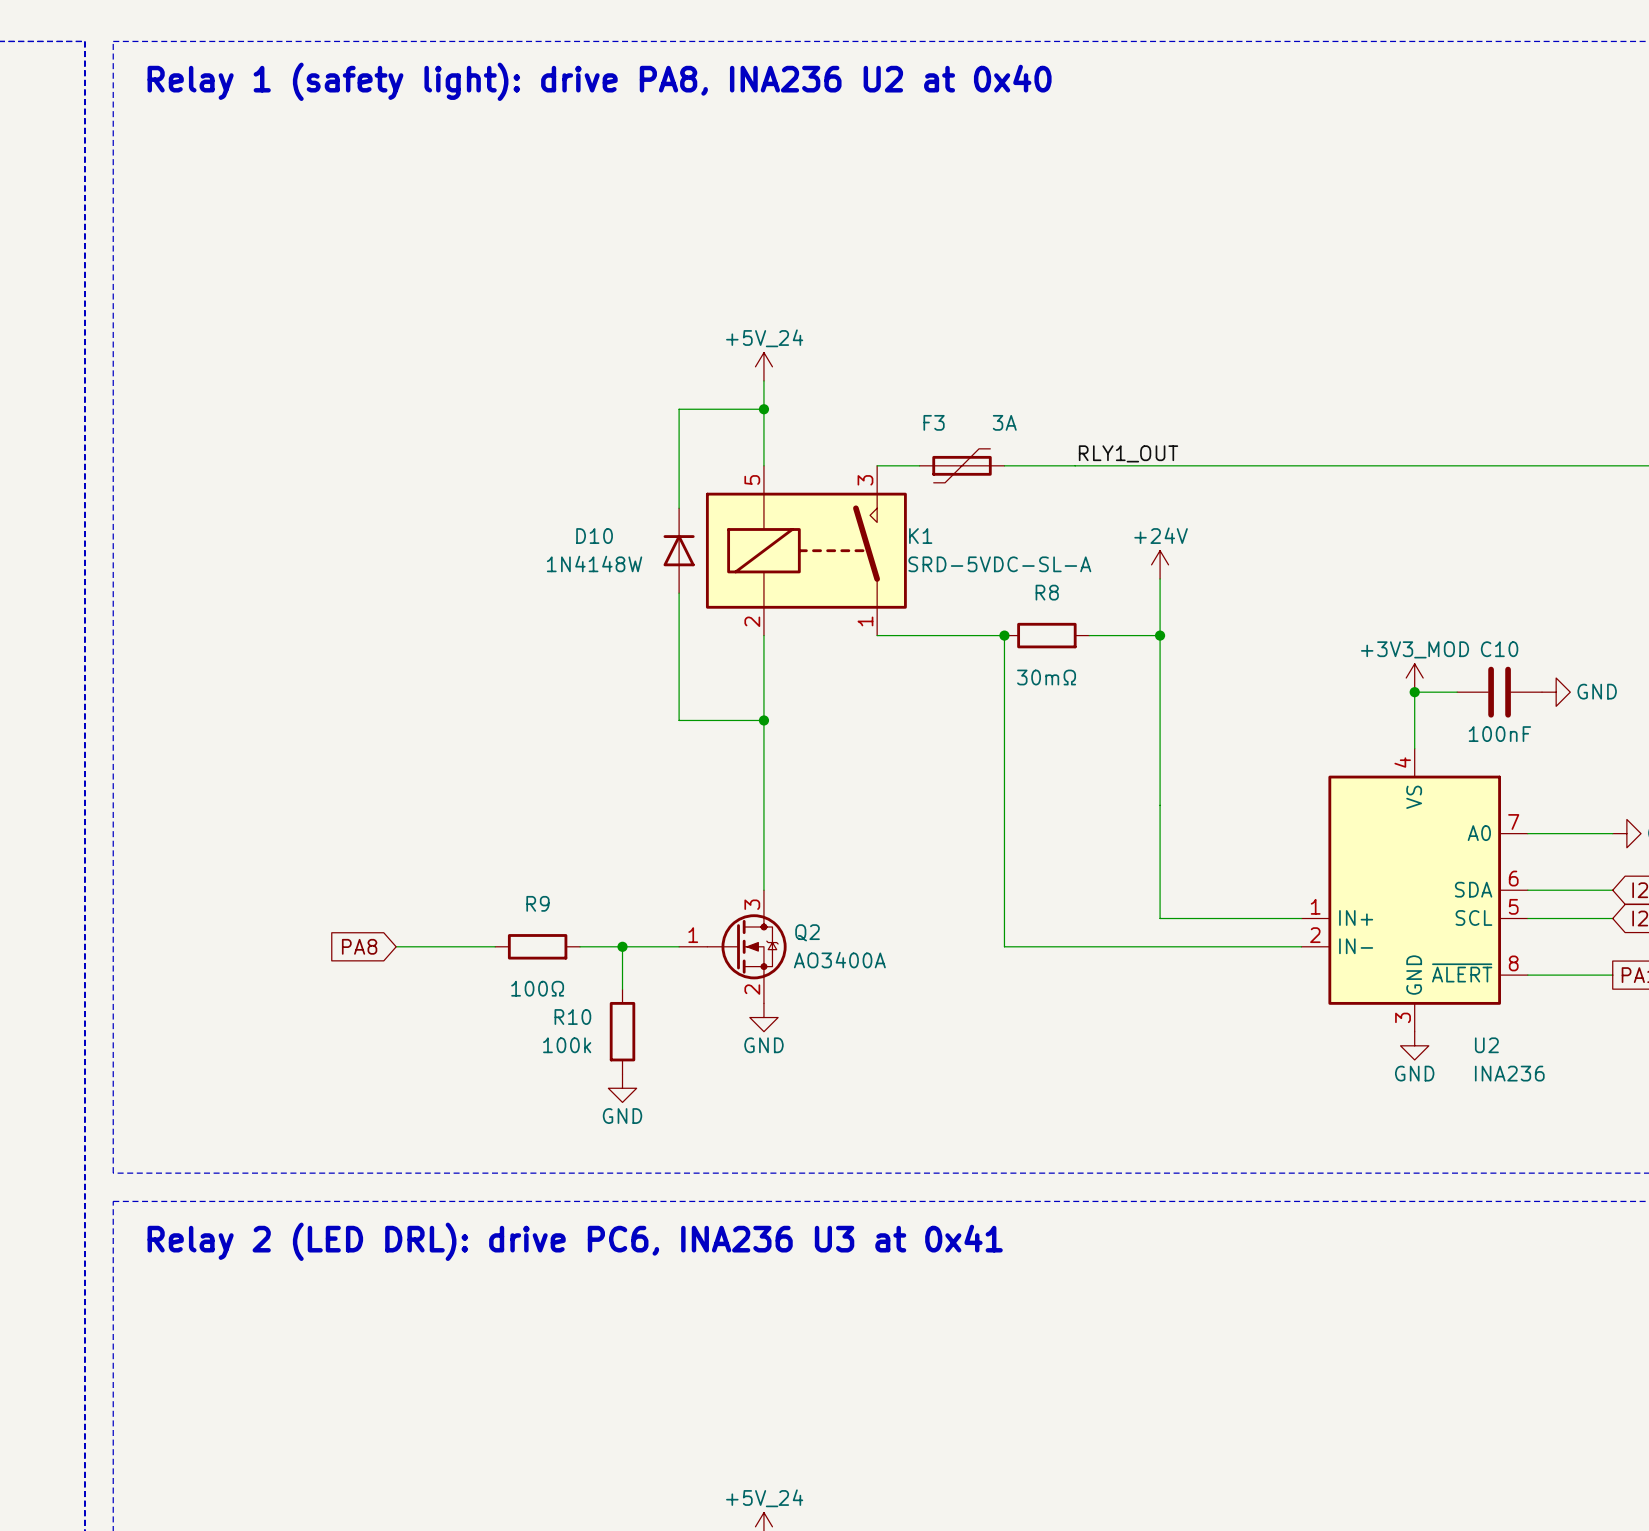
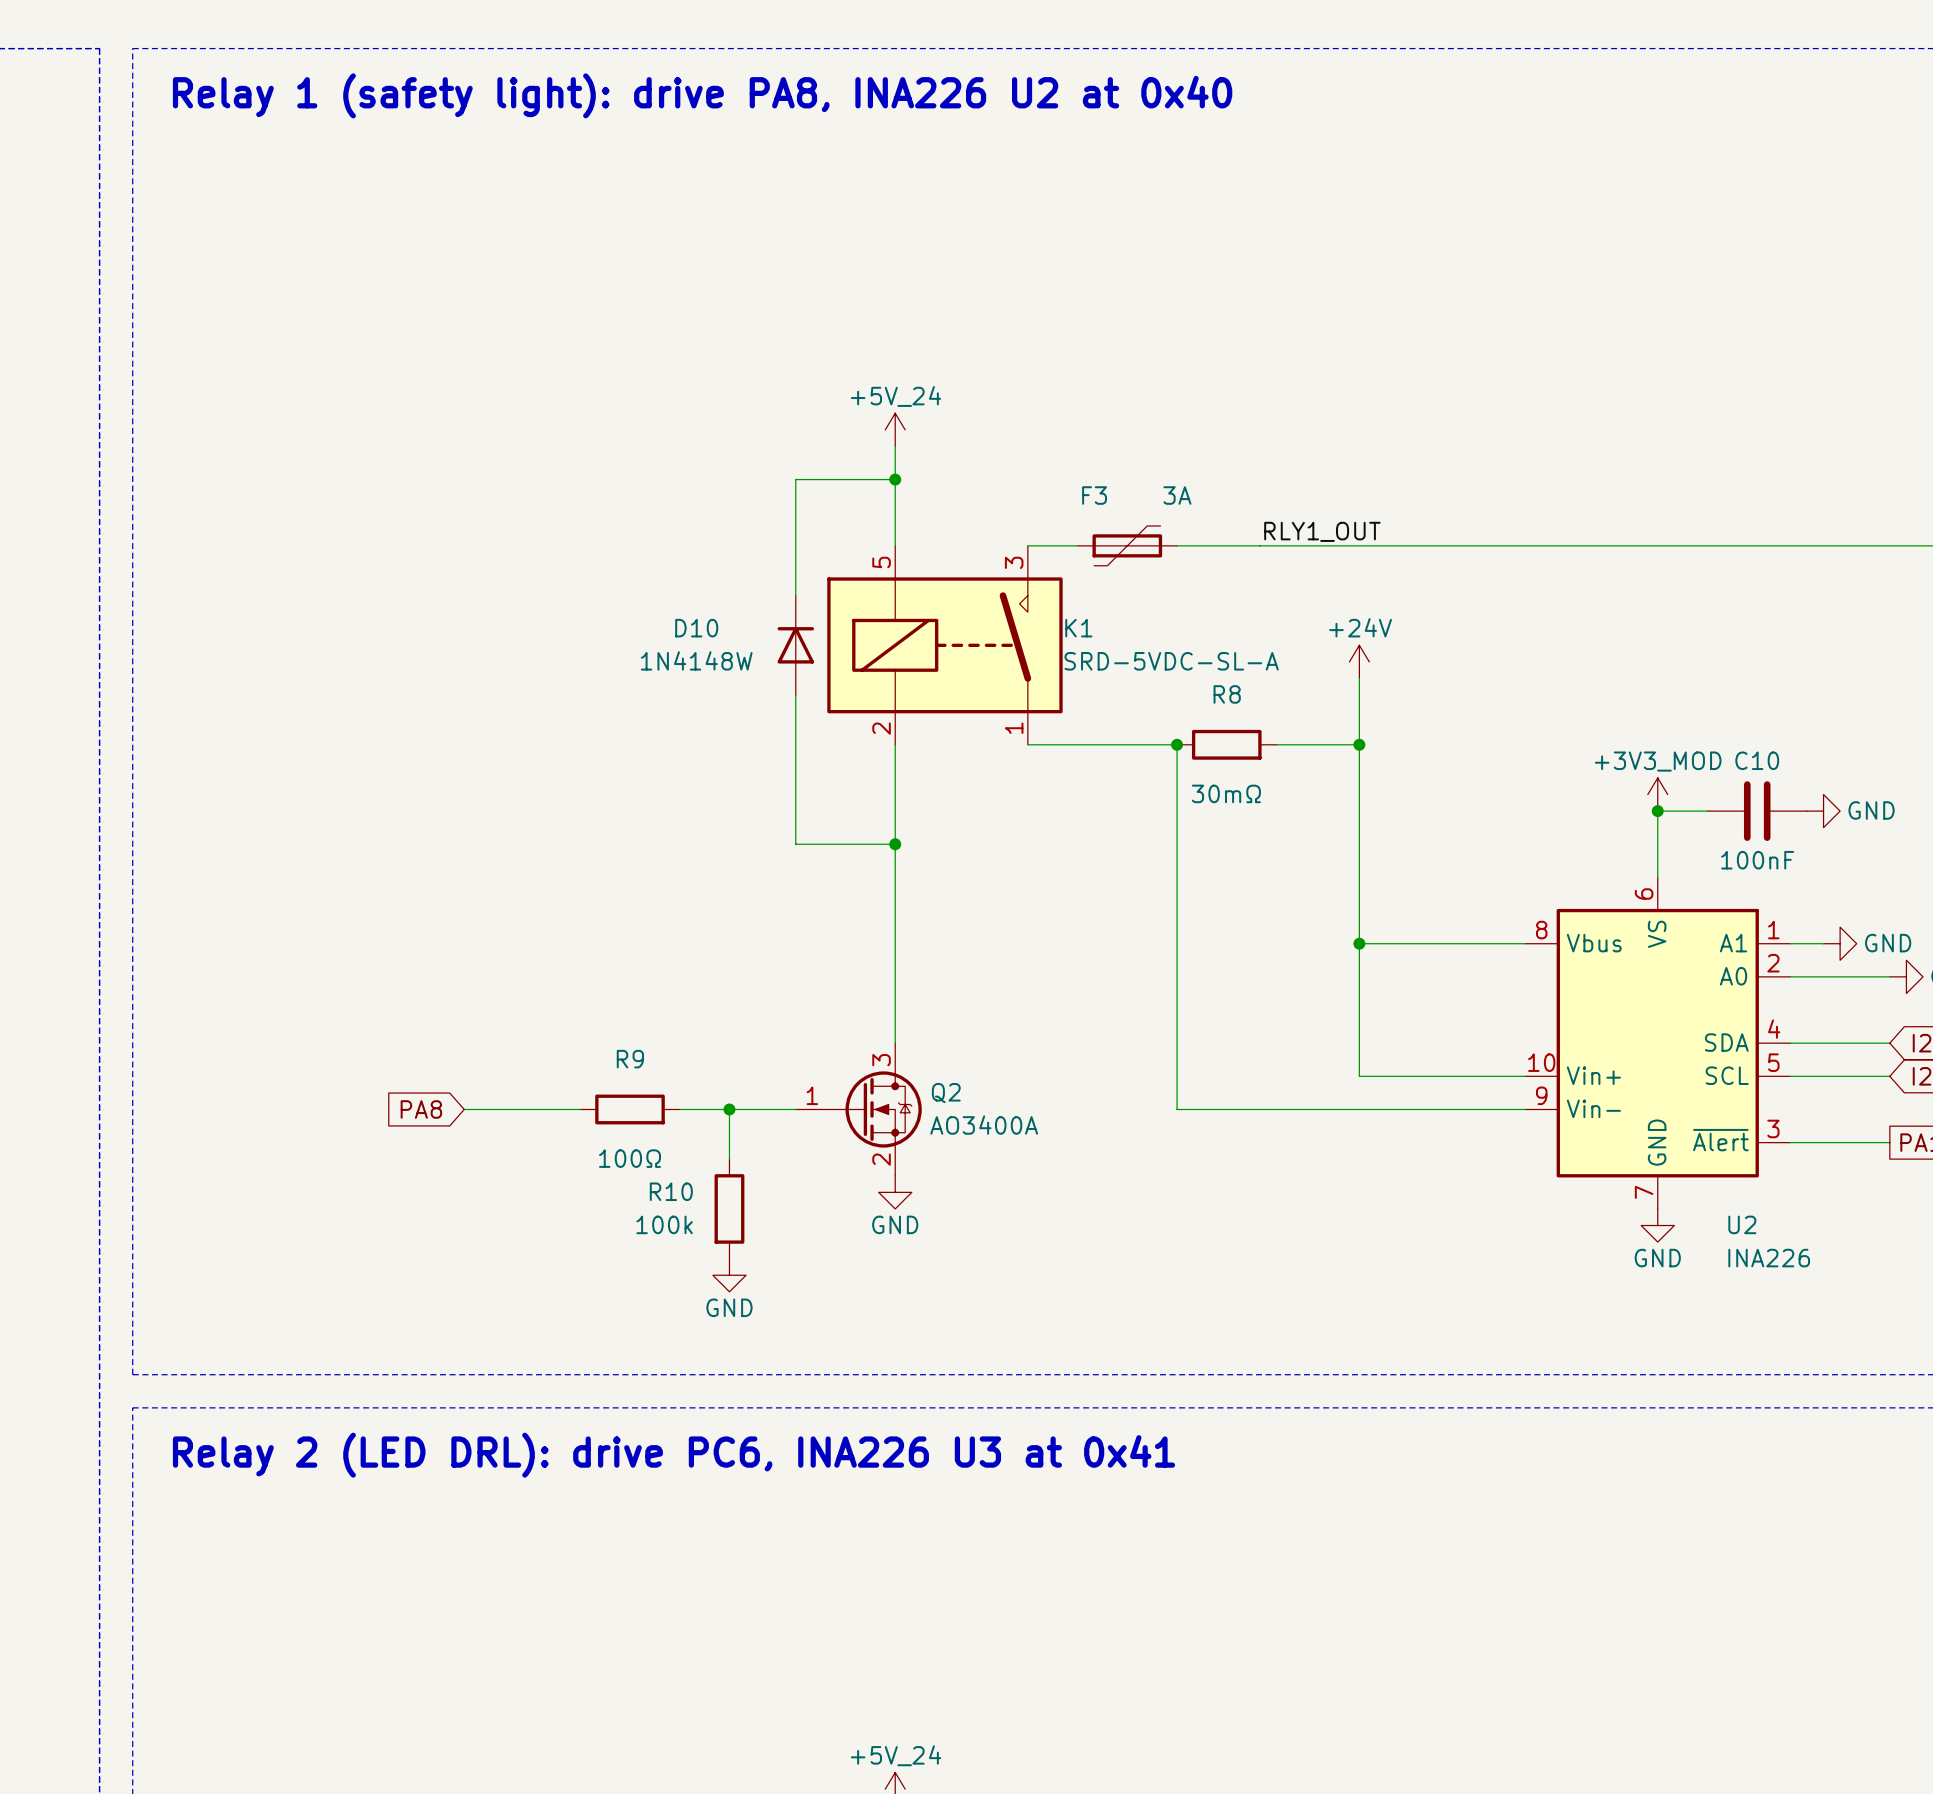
text: Relay 1 (safety light): drive PA8, INA236 U2 at 0x40 (599, 81) -> Relay 1 (safety light): drive PA8, INA226 U2 at 0x40 (702, 95)
U2 symbol: [1301, 748, 1528, 1032] -> [1525, 877, 1791, 1209]
wire: none -> (1359, 943) (1525, 943)
junction: none -> (1359, 943)
wire: none -> (1790, 943) (1823, 943)
power symbol: none -> GND (1840, 943)
U2 value: INA236 (1509, 1073) -> INA226 (1769, 1258)
text: Relay 2 (LED DRL): drive PC6, INA236 U3 at 0x41 (575, 1241) -> Relay 2 (LED DRL): drive PC6, INA226 U3 at 0x41 (673, 1455)

